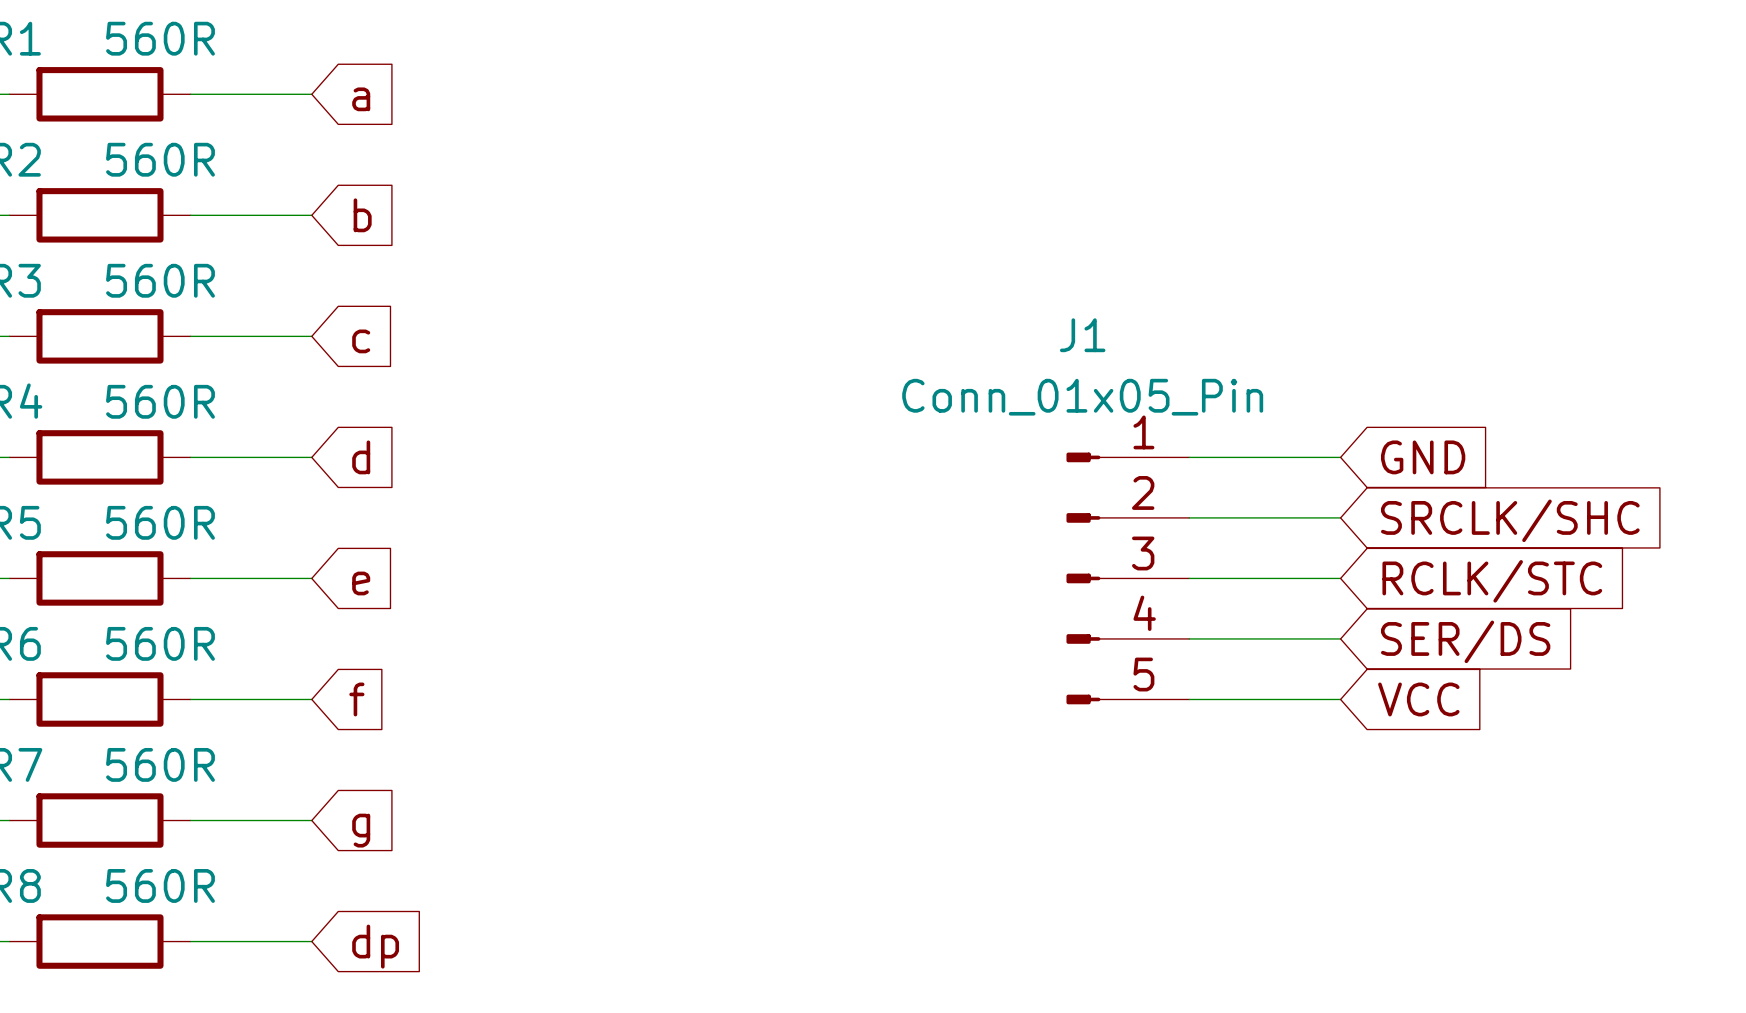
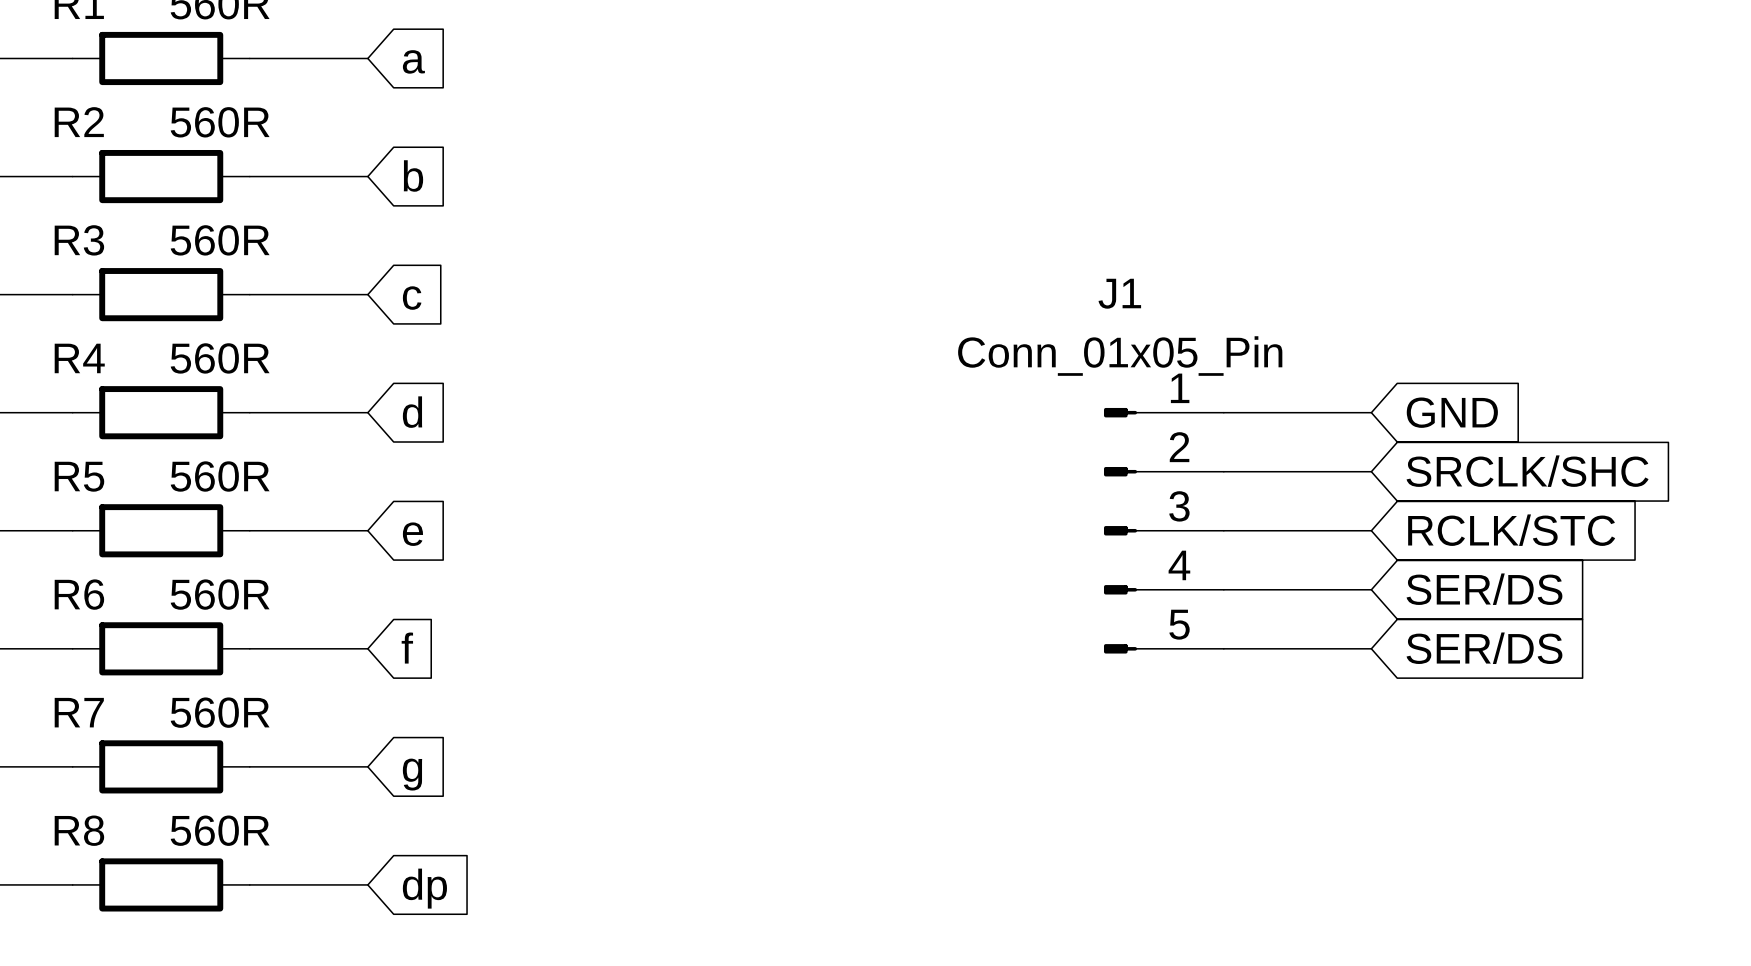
global label: VCC (1418, 699) -> SER/DS (1484, 648)

